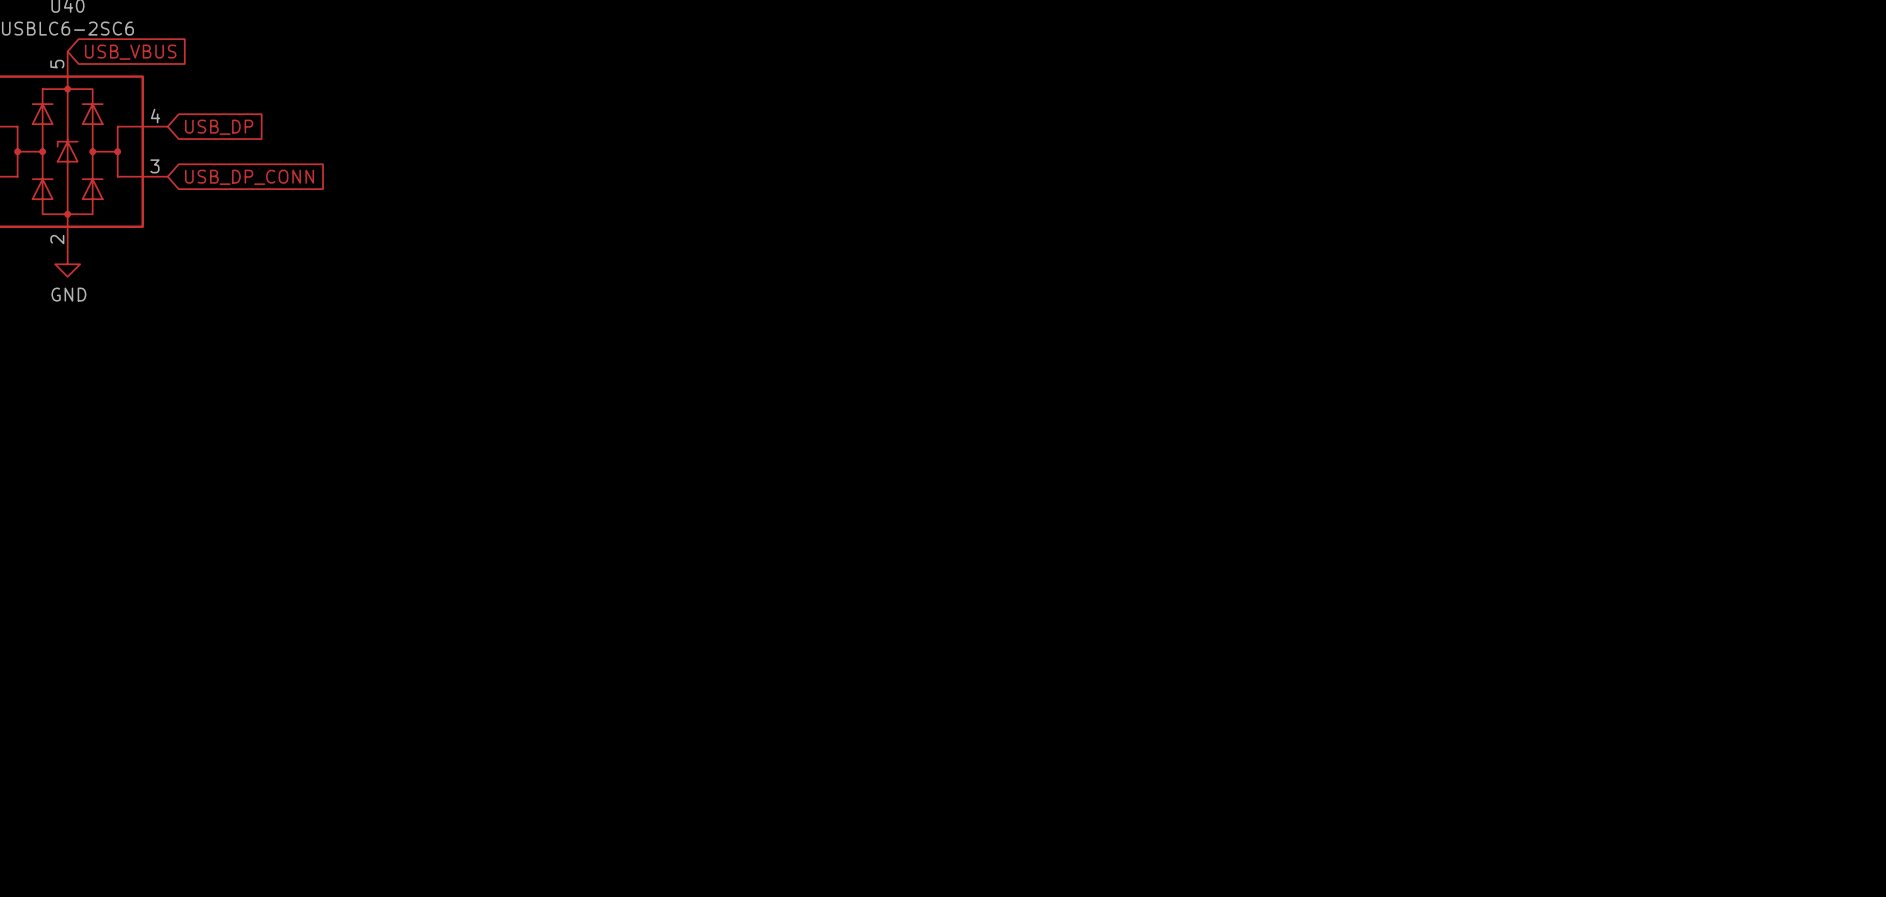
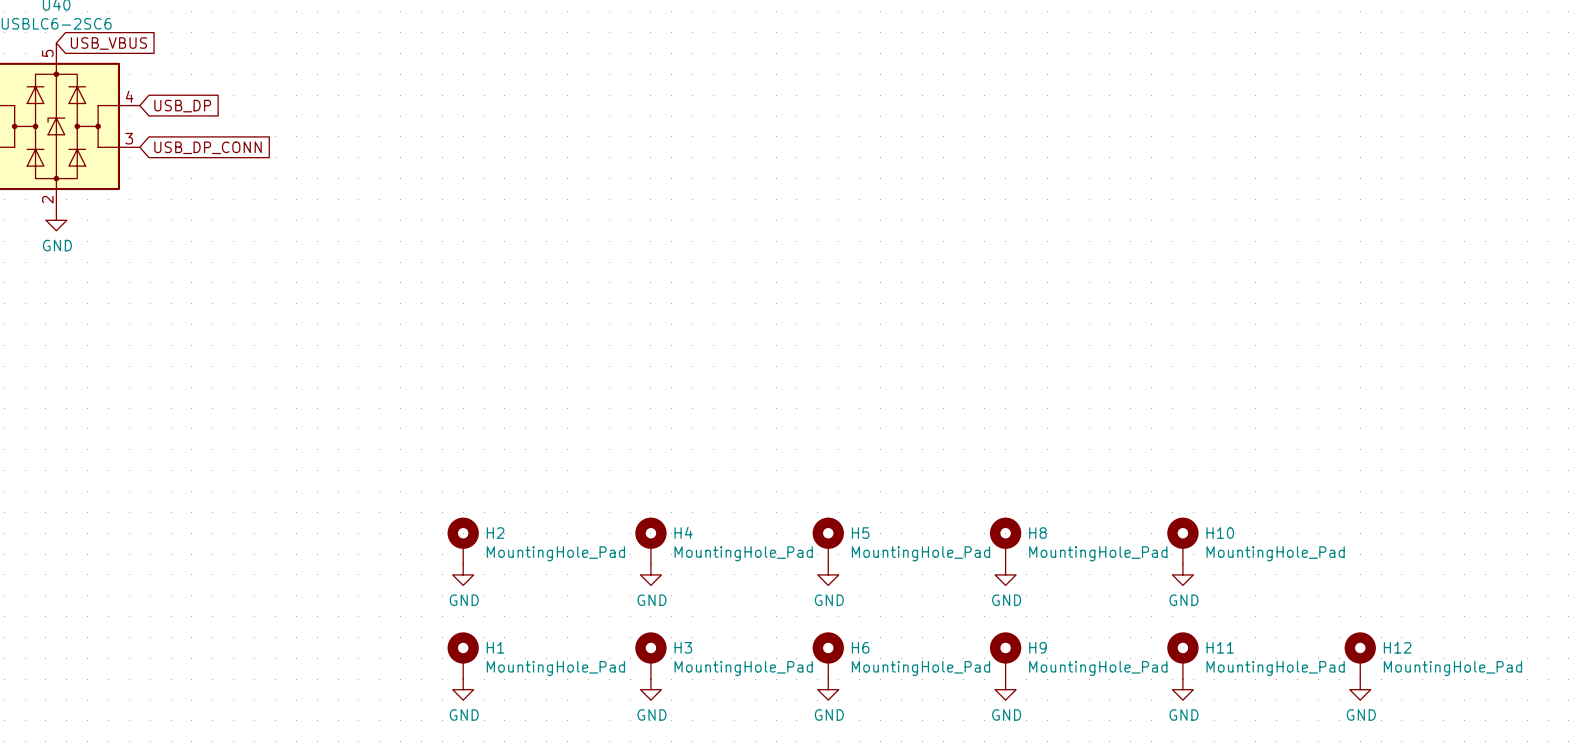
H2: none -> MountingHole_Pad (463, 541)
H4: none -> MountingHole_Pad (650, 541)
H5: none -> MountingHole_Pad (828, 541)
H8: none -> MountingHole_Pad (1005, 541)
H10: none -> MountingHole_Pad (1182, 541)
power symbol: none -> GND (463, 574)
power symbol: none -> GND (650, 574)
power symbol: none -> GND (828, 574)
power symbol: none -> GND (1005, 574)
power symbol: none -> GND (1182, 574)
H1: none -> MountingHole_Pad (463, 655)
H3: none -> MountingHole_Pad (650, 655)
H6: none -> MountingHole_Pad (828, 655)
H9: none -> MountingHole_Pad (1005, 655)
H11: none -> MountingHole_Pad (1182, 655)
H12: none -> MountingHole_Pad (1360, 655)
power symbol: none -> GND (463, 689)
power symbol: none -> GND (650, 689)
power symbol: none -> GND (828, 689)
power symbol: none -> GND (1005, 689)
power symbol: none -> GND (1182, 689)
power symbol: none -> GND (1360, 689)

